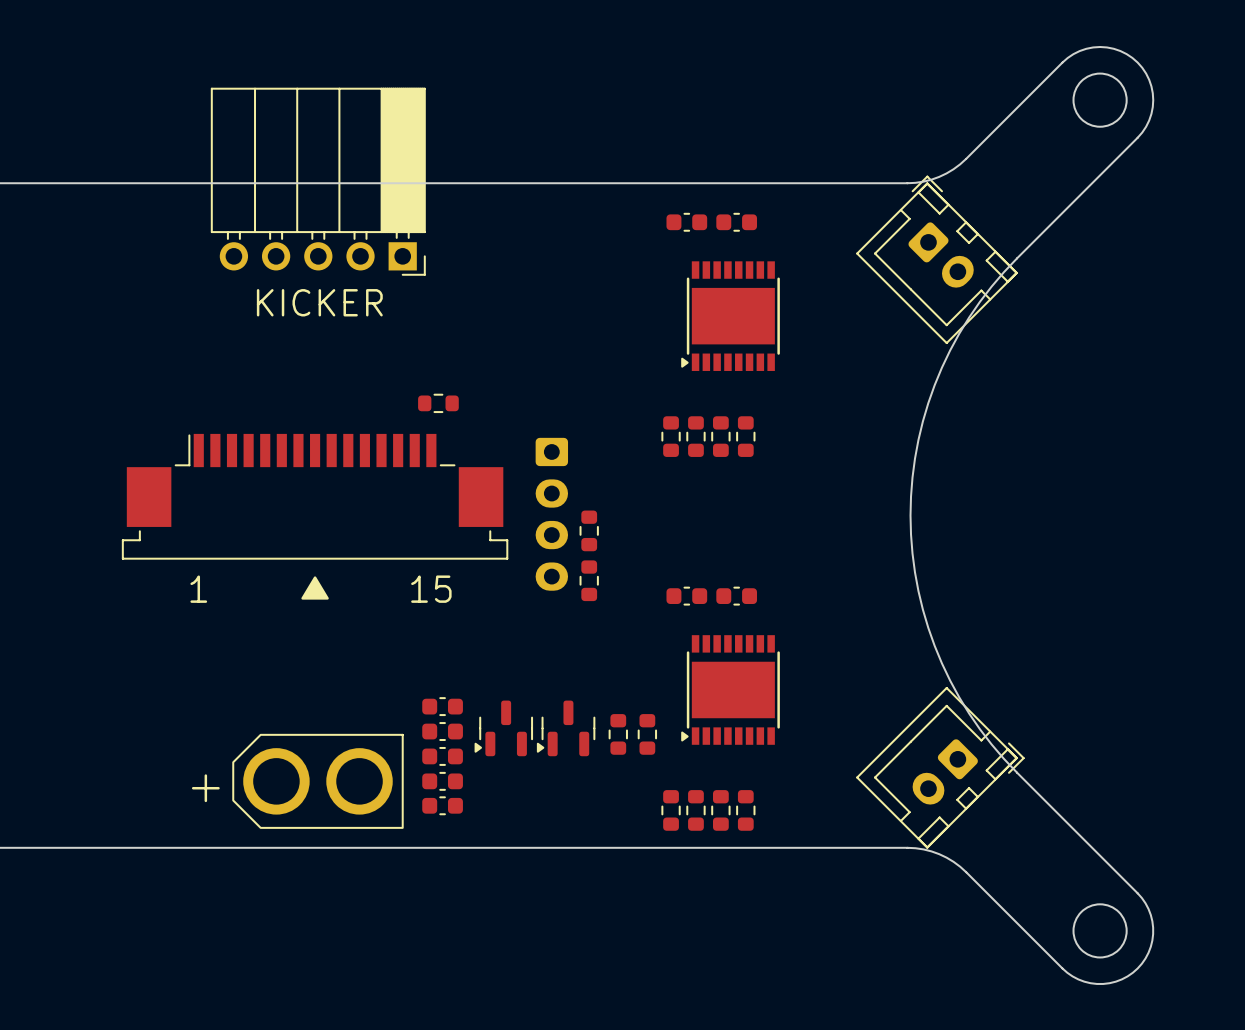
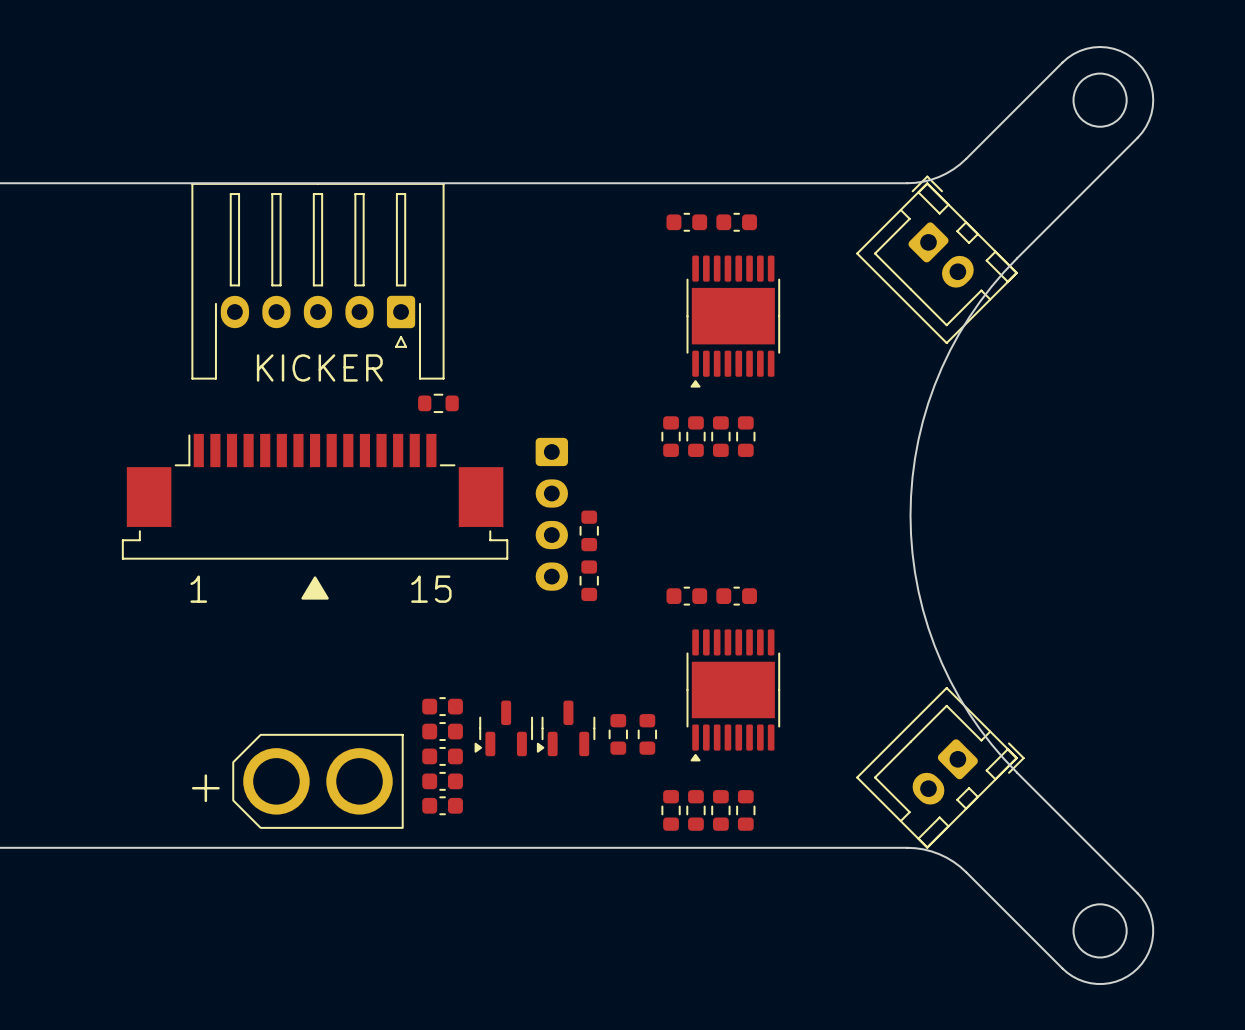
part: (318, 181) -> none
part footprint: [681, 261, 780, 371] -> [686, 255, 781, 388]
part: none -> (317, 281)
text position: KICKER (319, 302) -> KICKER (319, 367)
part footprint: [681, 635, 780, 745] -> [686, 629, 781, 762]

